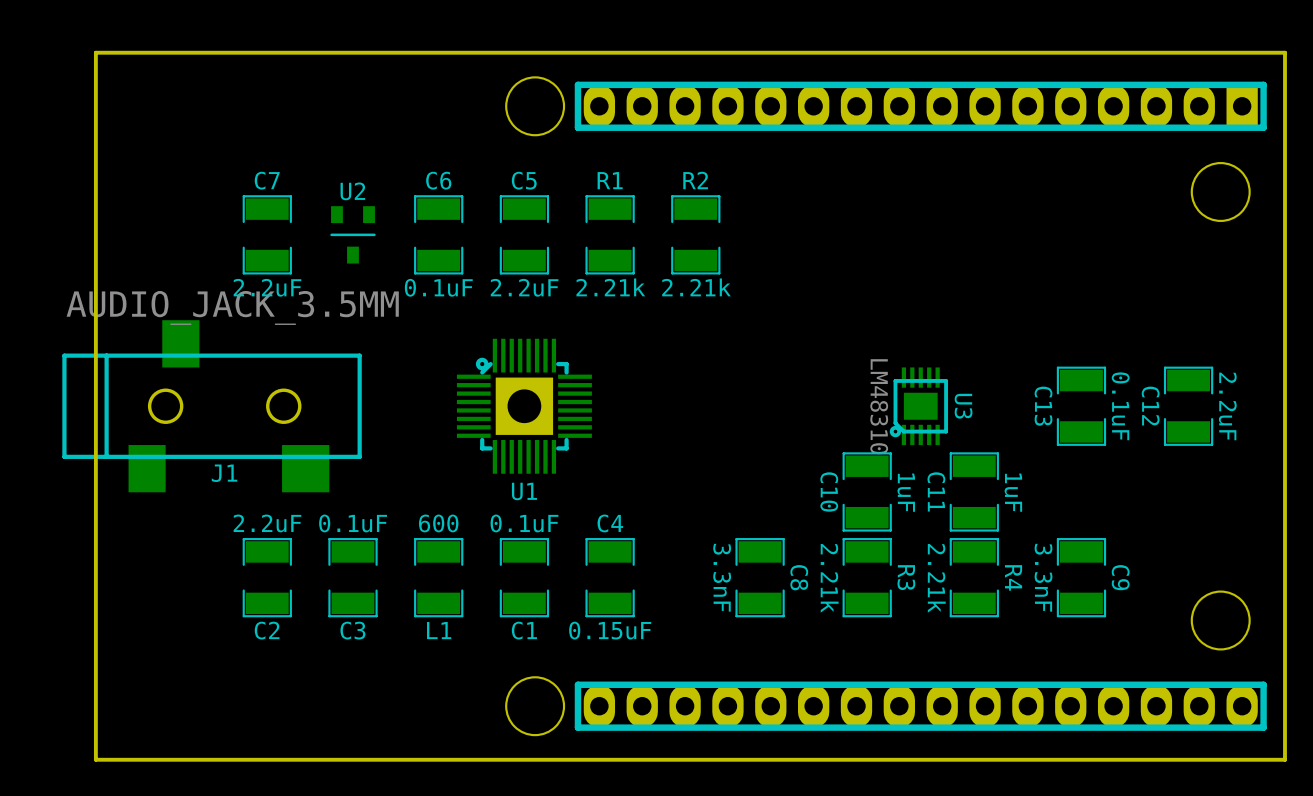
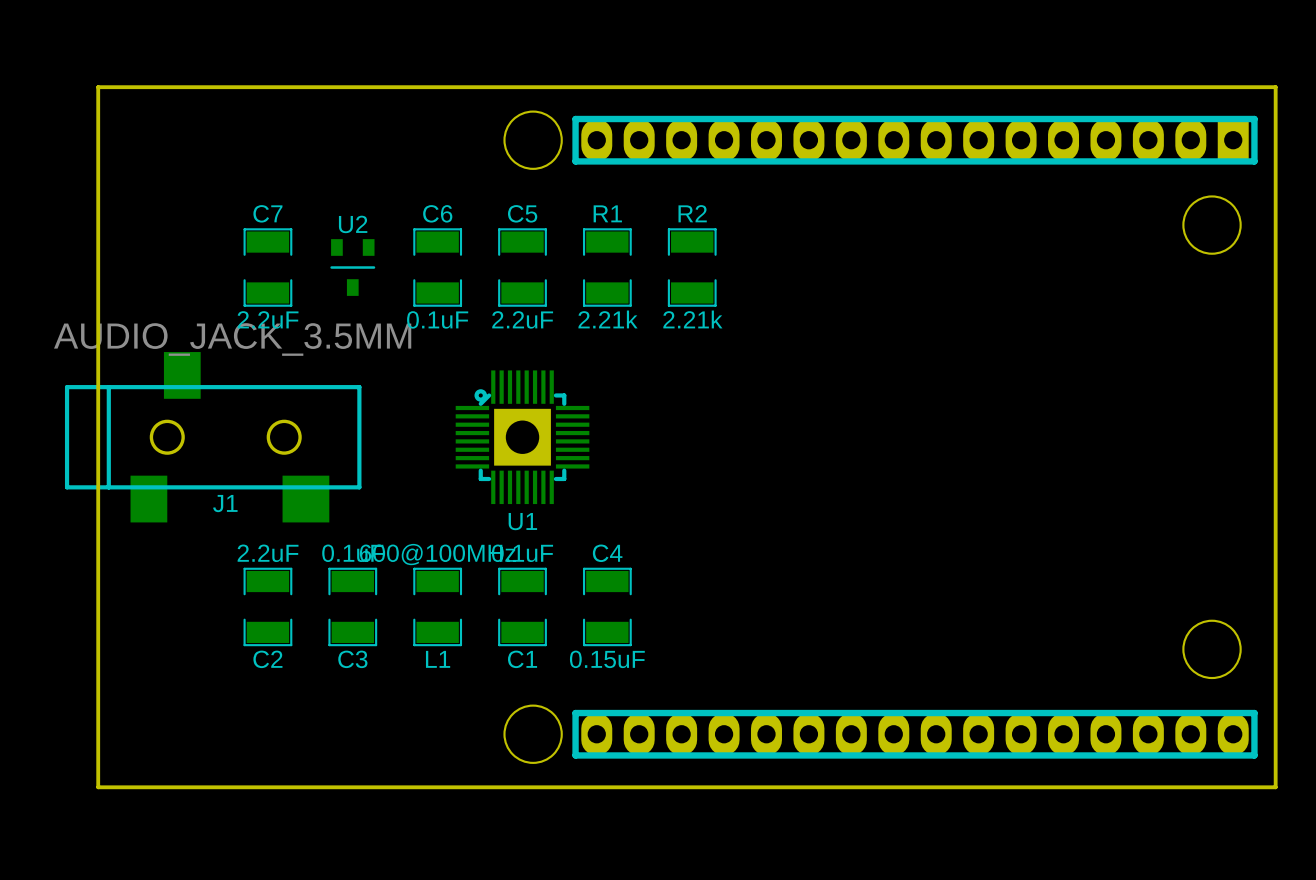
U3: LM48310 (918, 406) -> none
C13: 0.1uF (1081, 406) -> none
C12: 2.2uF (1188, 406) -> none
C10: 1uF (867, 491) -> none
C11: 1uF (974, 491) -> none
L1 value: 600 (438, 523) -> 600@100MHz (437, 554)
C8: 3.3nF (760, 577) -> none
R3: 2.21k (867, 577) -> none
R4: 2.21k (974, 577) -> none
C9: 3.3nF (1081, 577) -> none

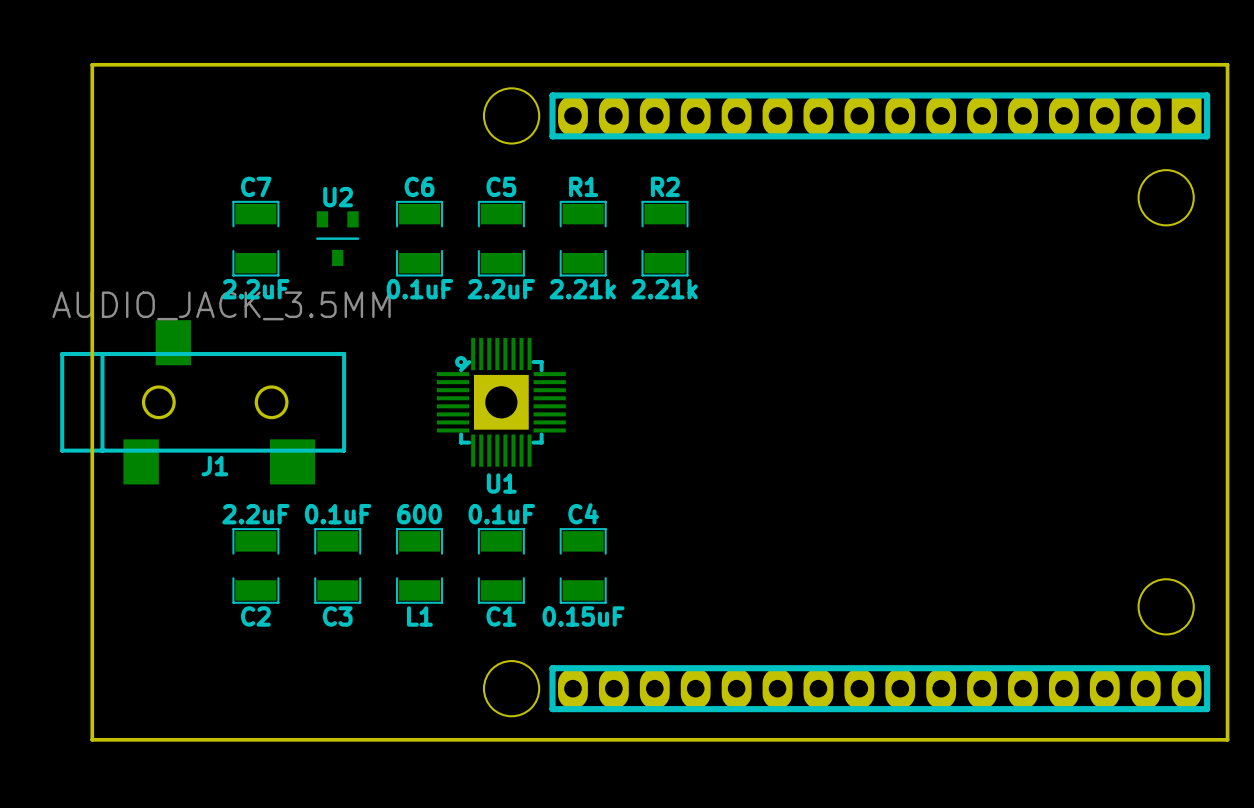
L1 value: 600@100MHz (437, 554) -> 600 (419, 514)

